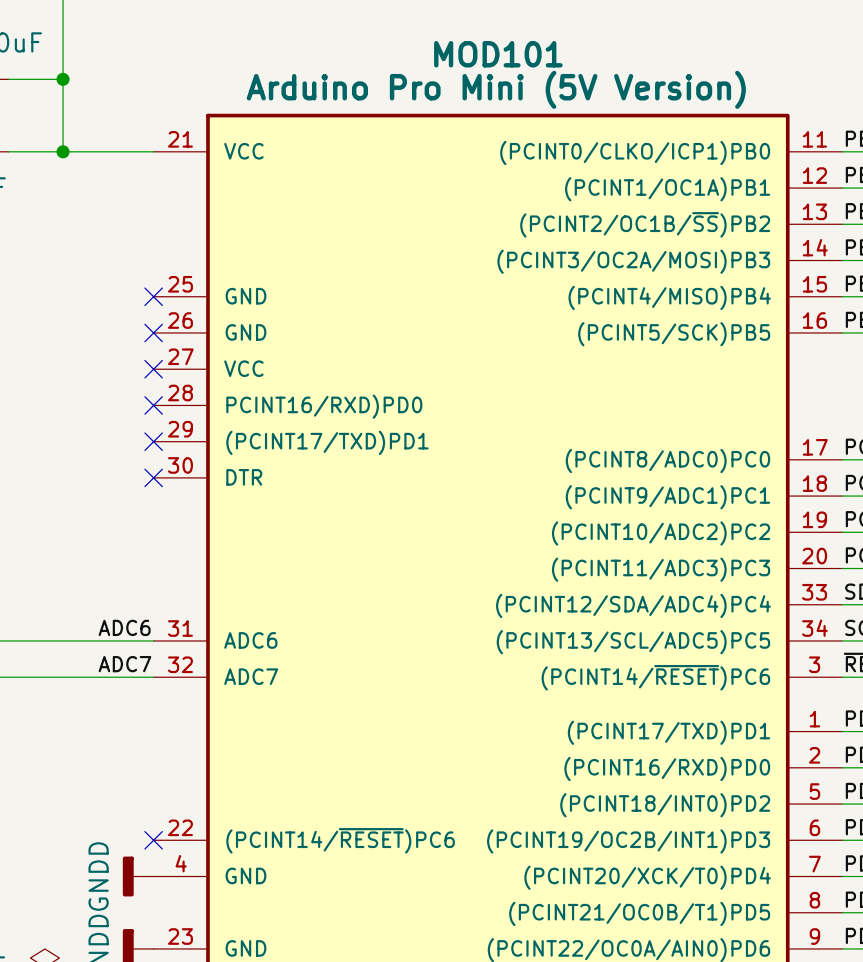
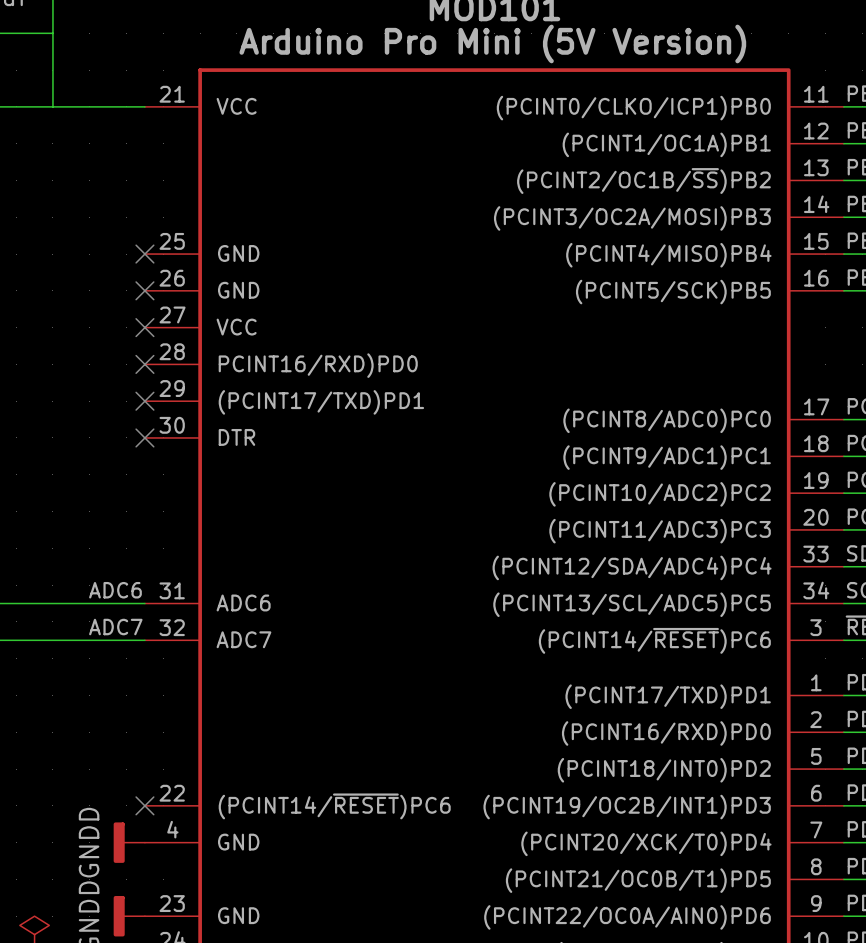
junction: (63, 79) -> none
junction: (63, 151) -> none

